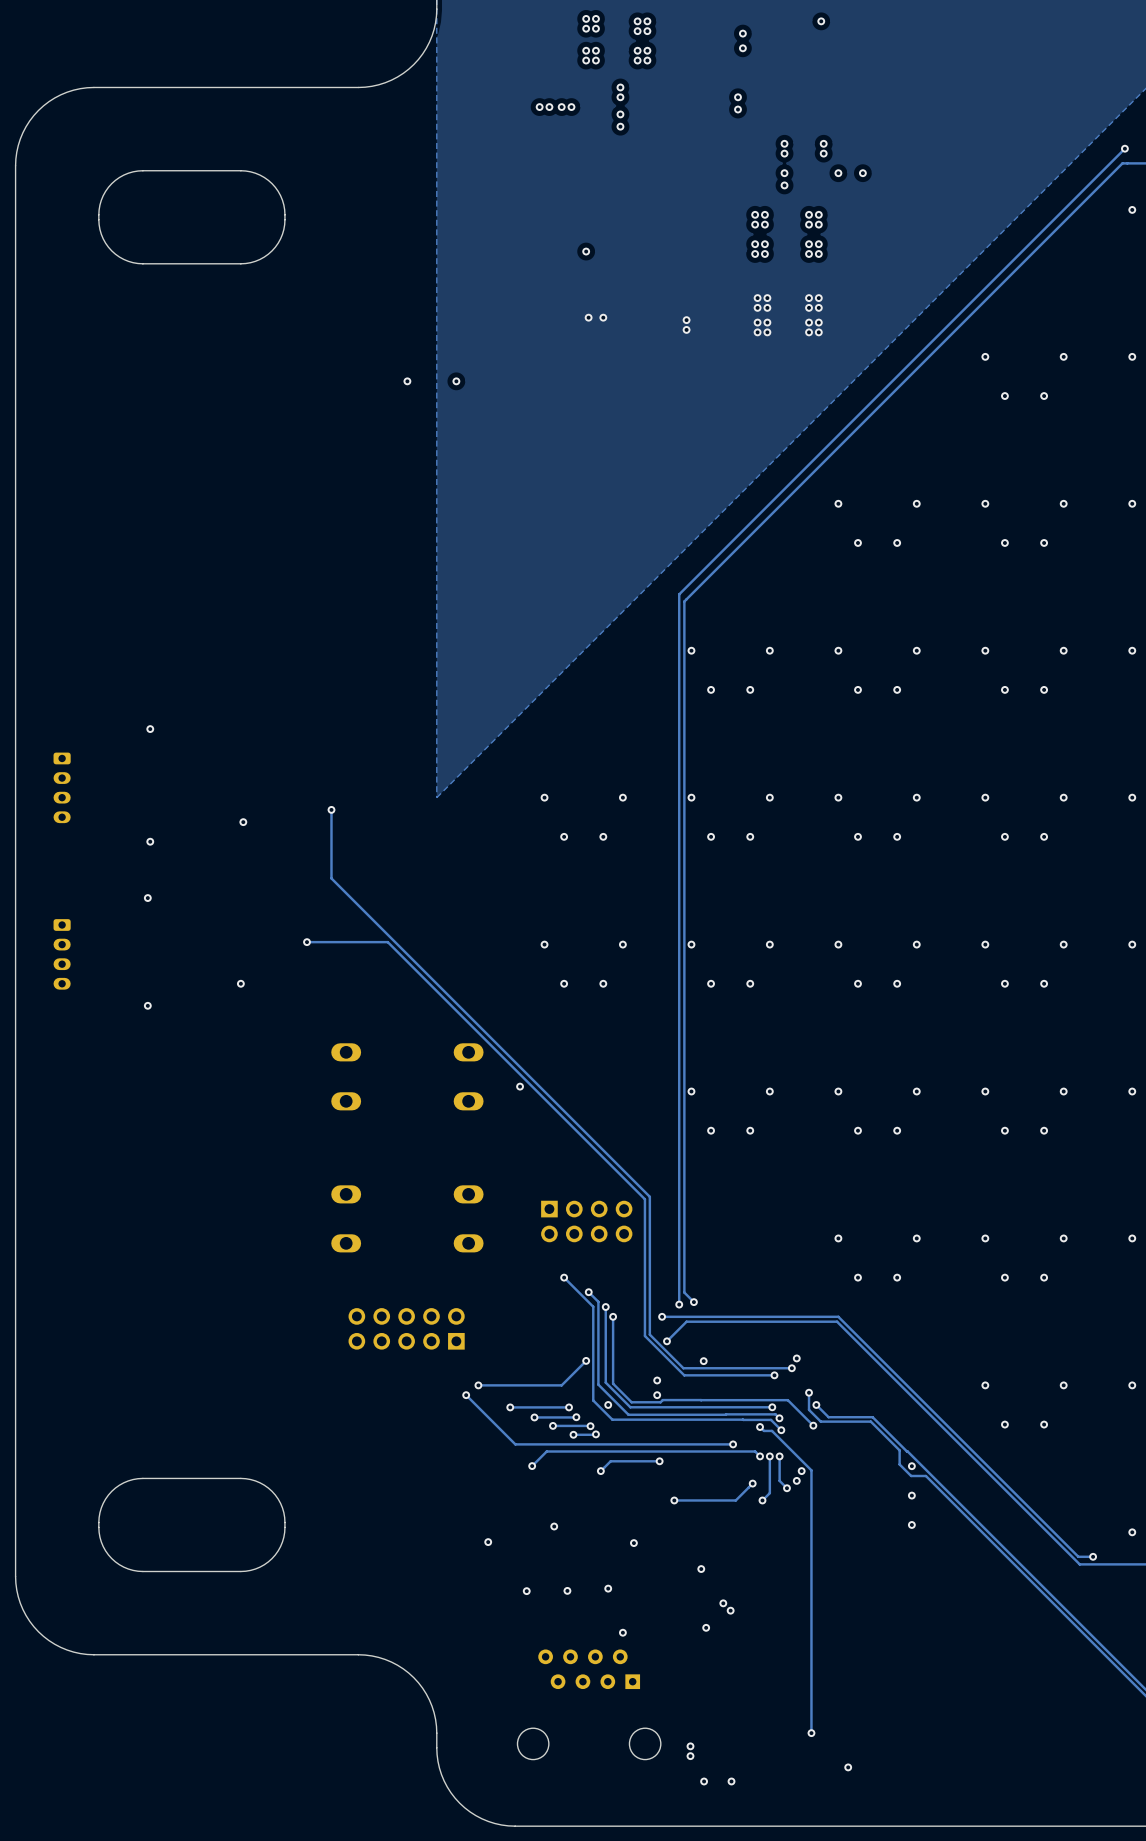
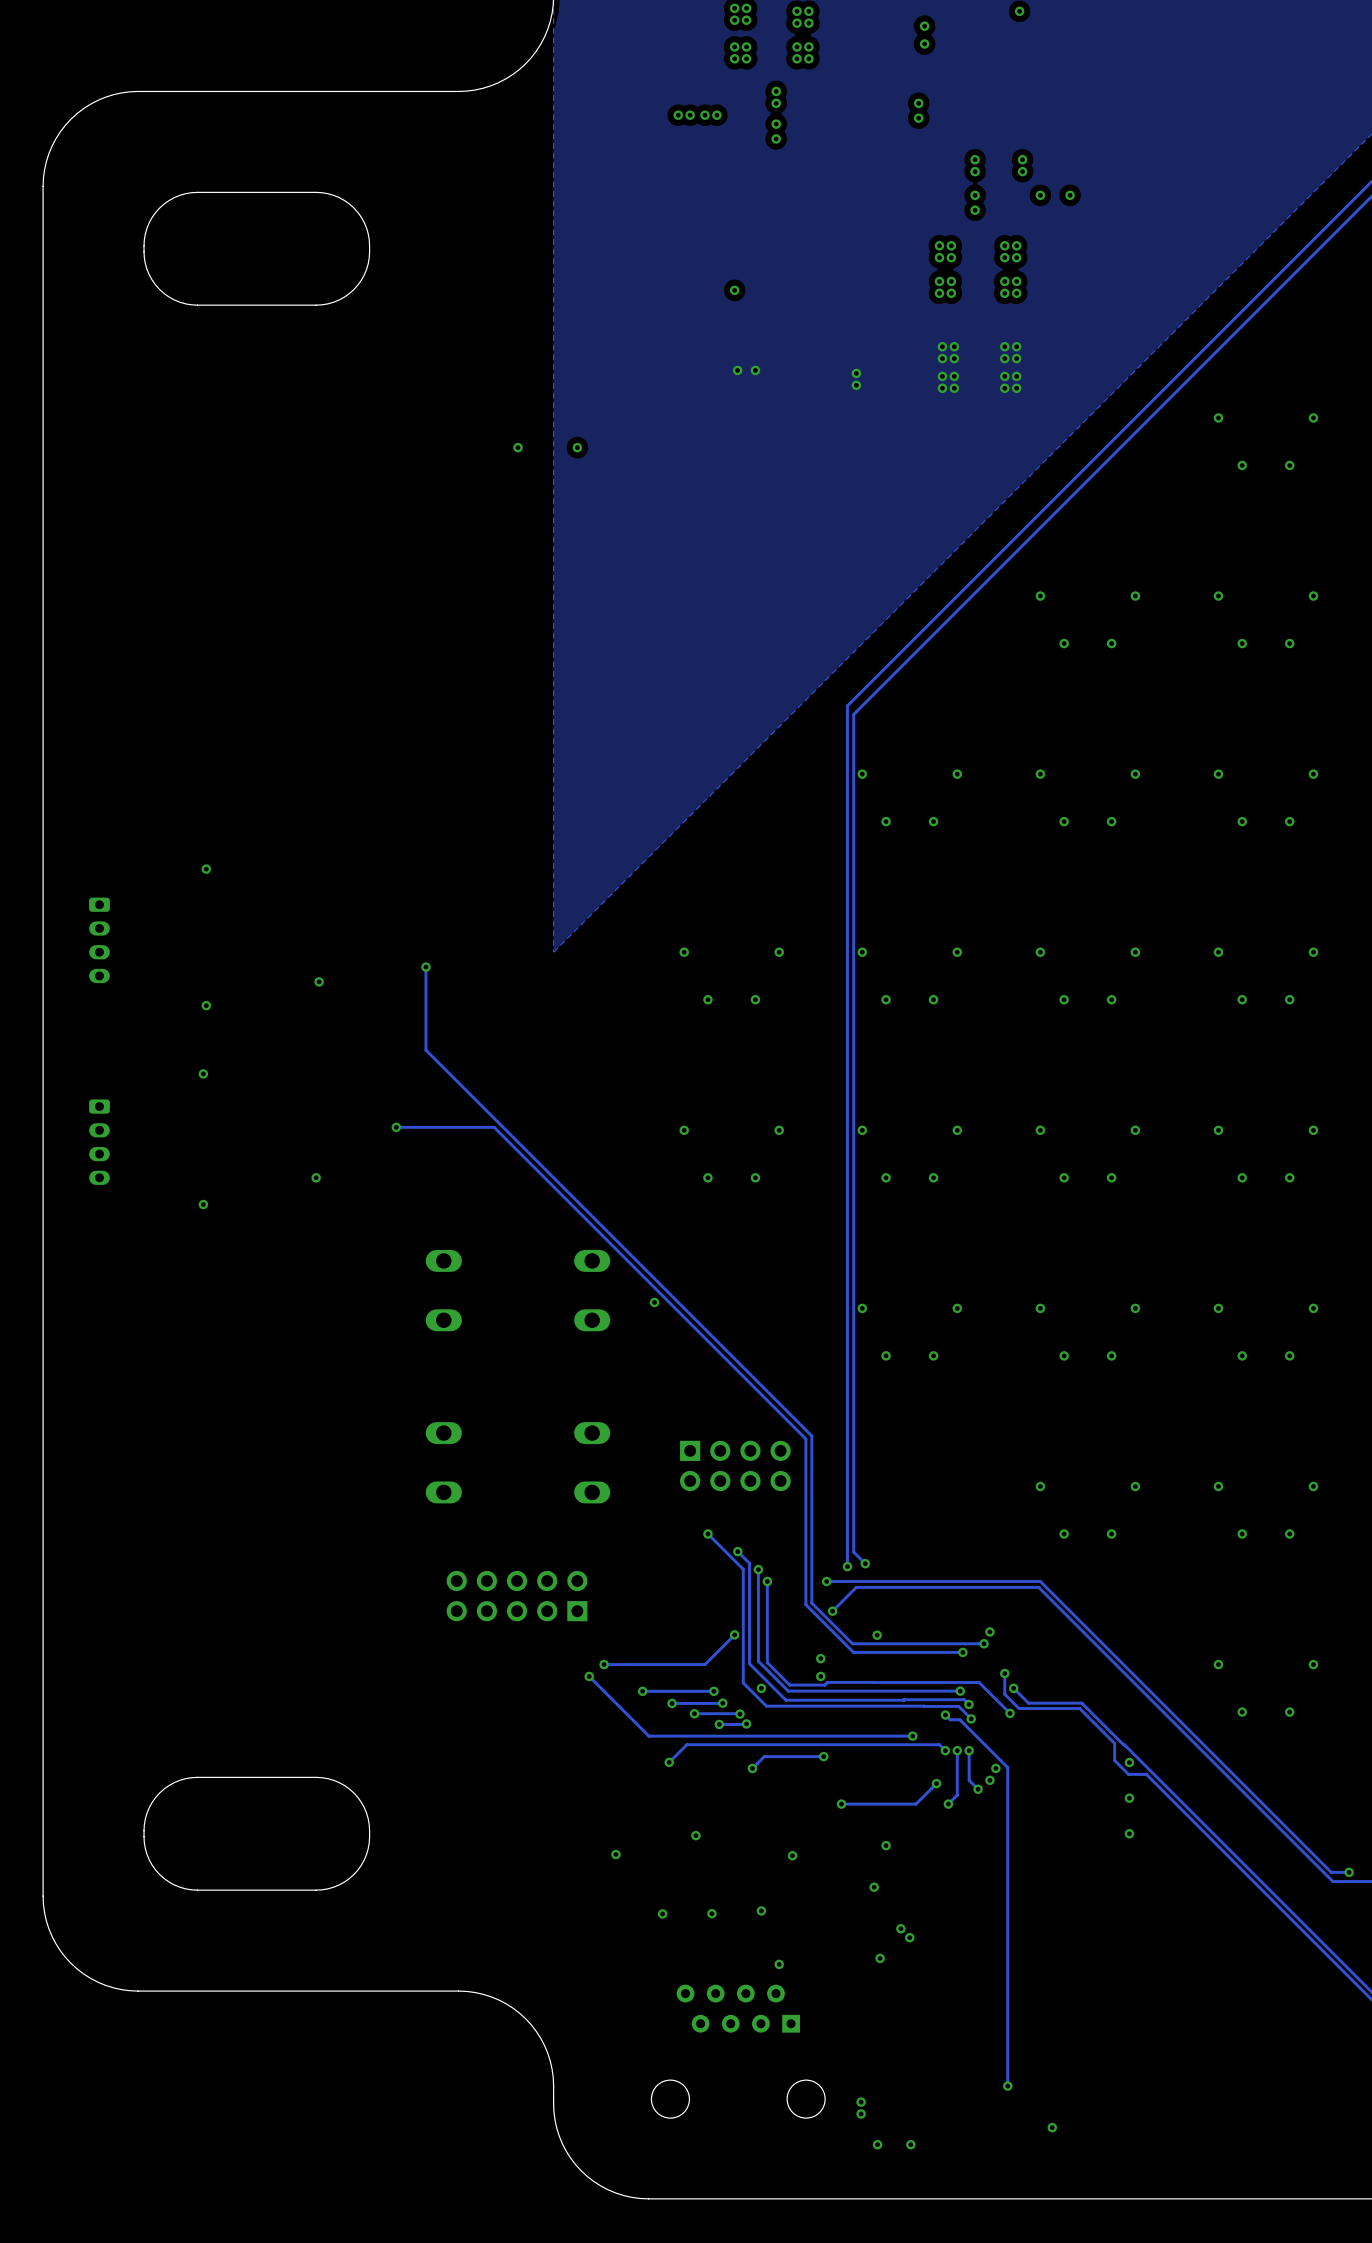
via: none -> (886, 1845)

